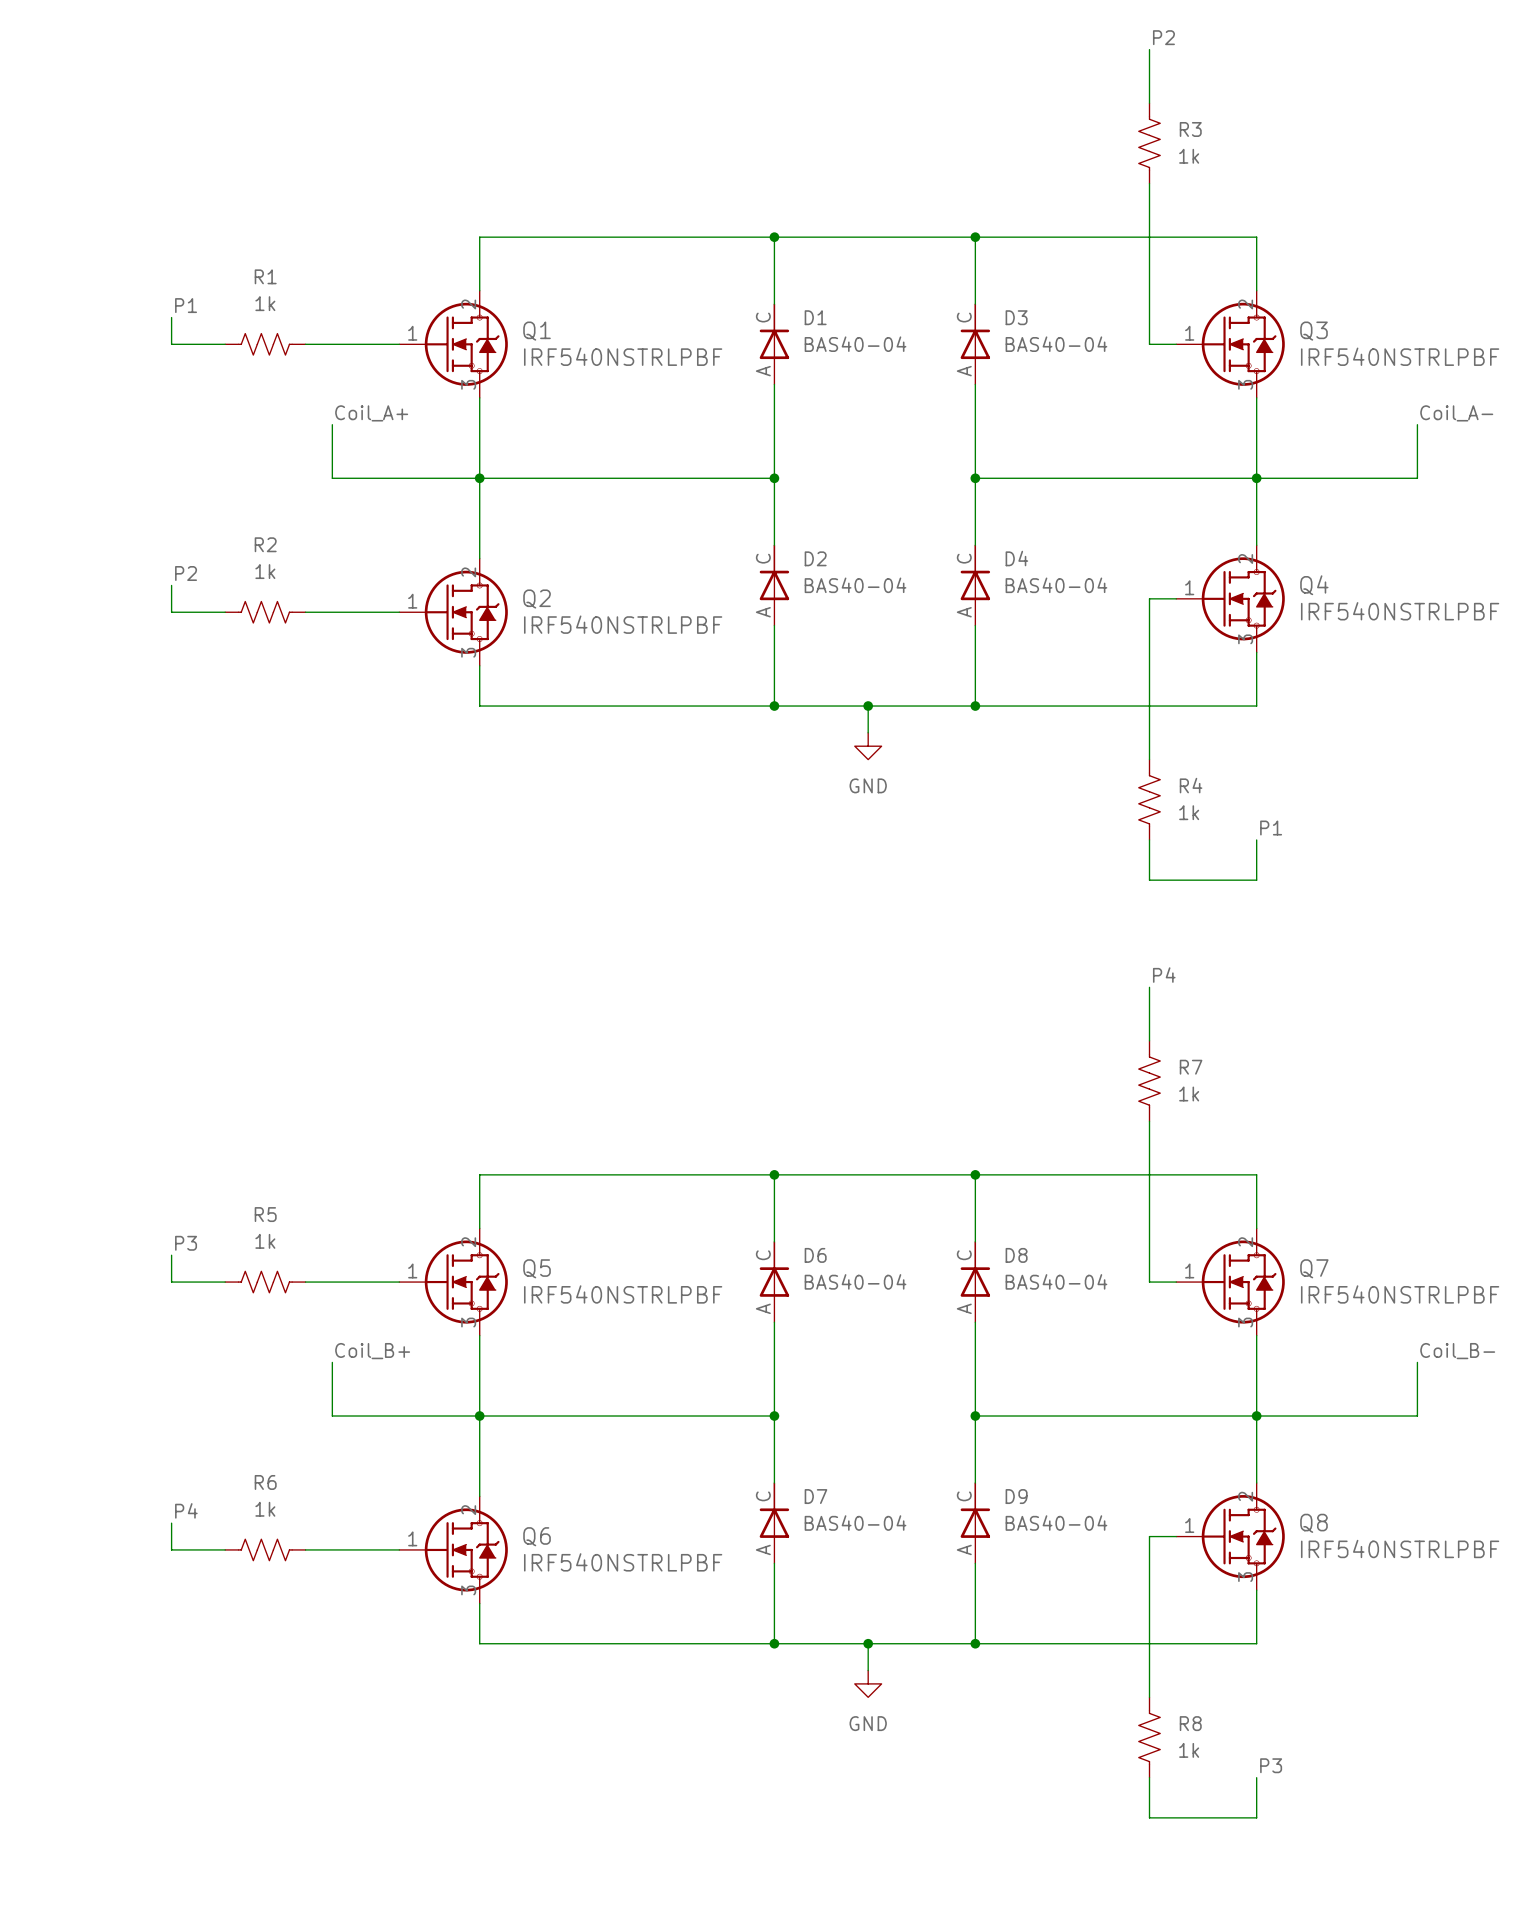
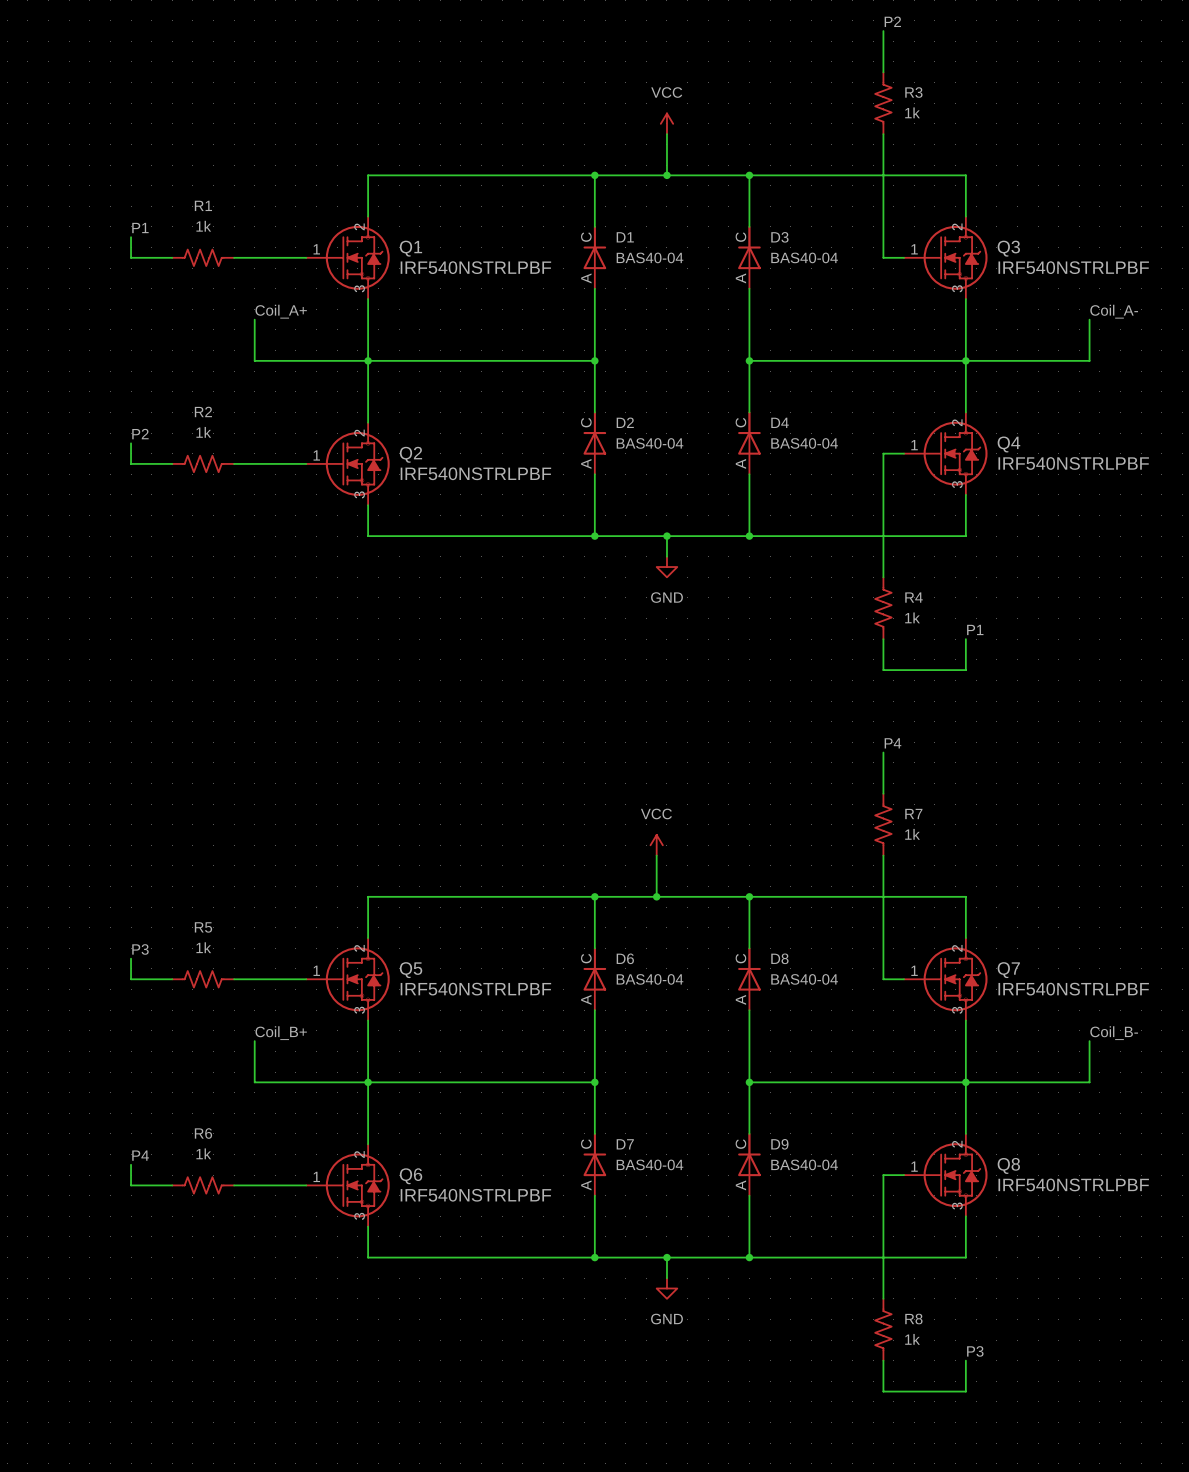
power symbol: none -> VCC (666, 123)
wire: none -> (666, 134) (666, 175)
junction: none -> (666, 175)
power symbol: none -> VCC (656, 845)
wire: none -> (656, 855) (656, 896)
junction: none -> (656, 896)

